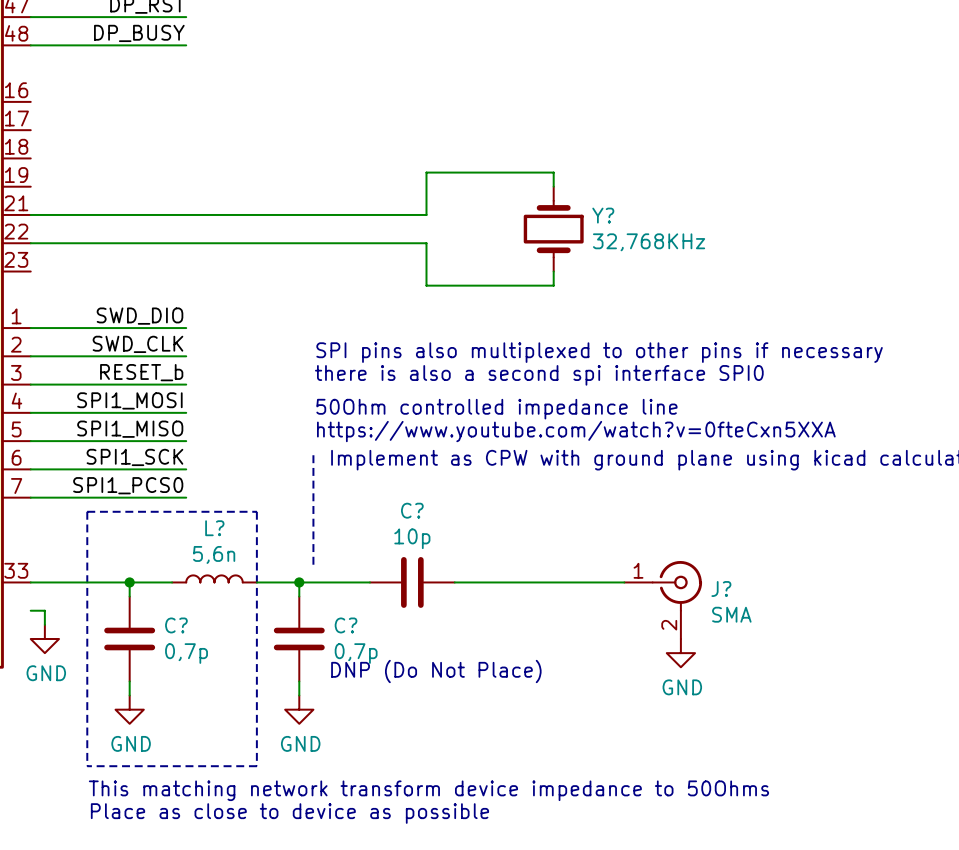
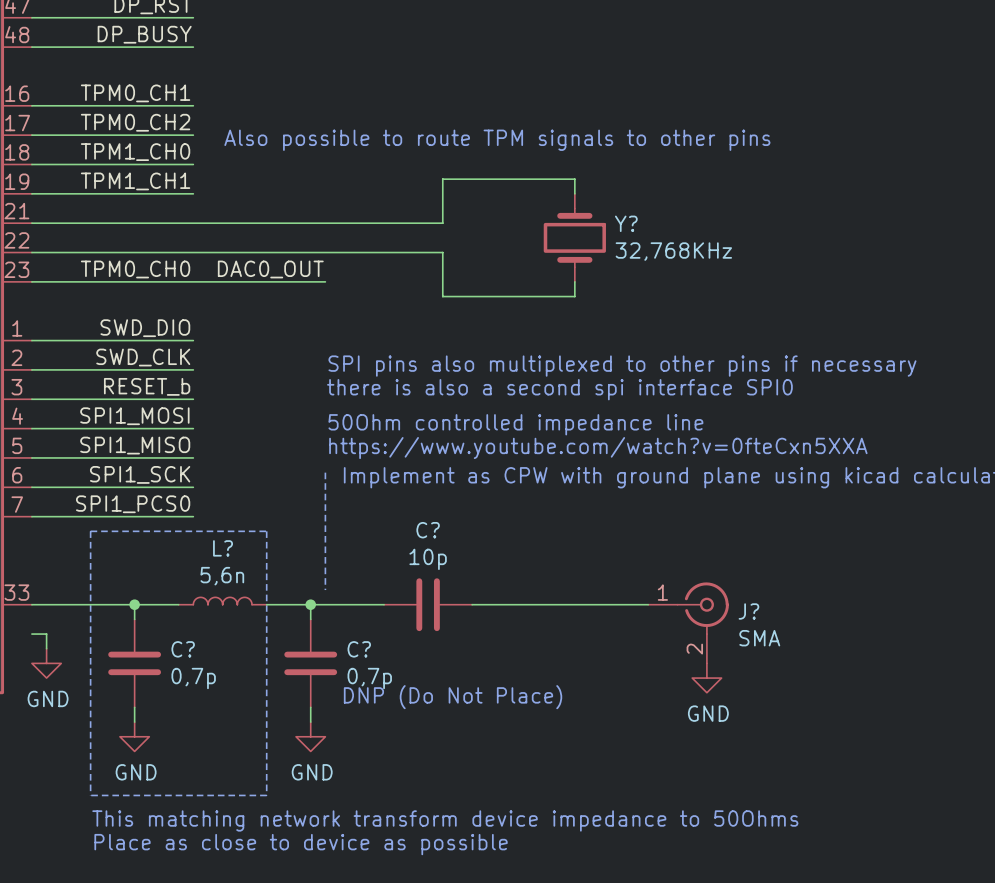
label: none -> TPM0_CH1 (135, 93)
wire: none -> (31, 105) (193, 105)
label: none -> TPM0_CH2 (135, 122)
wire: none -> (31, 135) (193, 135)
text: none -> Also possible to route TPM signals to other pins (497, 140)
label: none -> TPM1_CH0 (135, 152)
wire: none -> (31, 164) (193, 164)
label: none -> TPM1_CH1 (135, 181)
wire: none -> (31, 193) (193, 193)
label: none -> TPM0_CH0 (135, 269)
label: none -> DAC0_OUT (270, 269)
wire: none -> (31, 281) (325, 281)

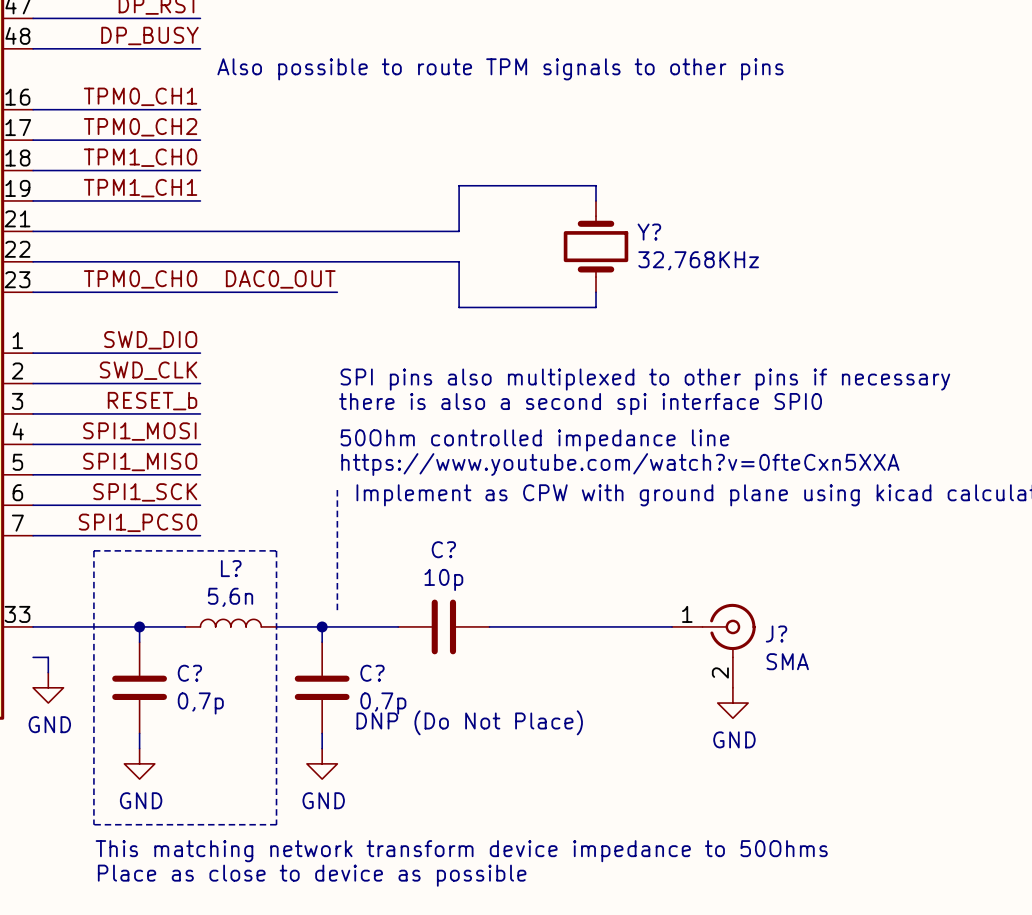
text position: Also possible to route TPM signals to other pins (497, 140) -> Also possible to route TPM signals to other pins (500, 69)

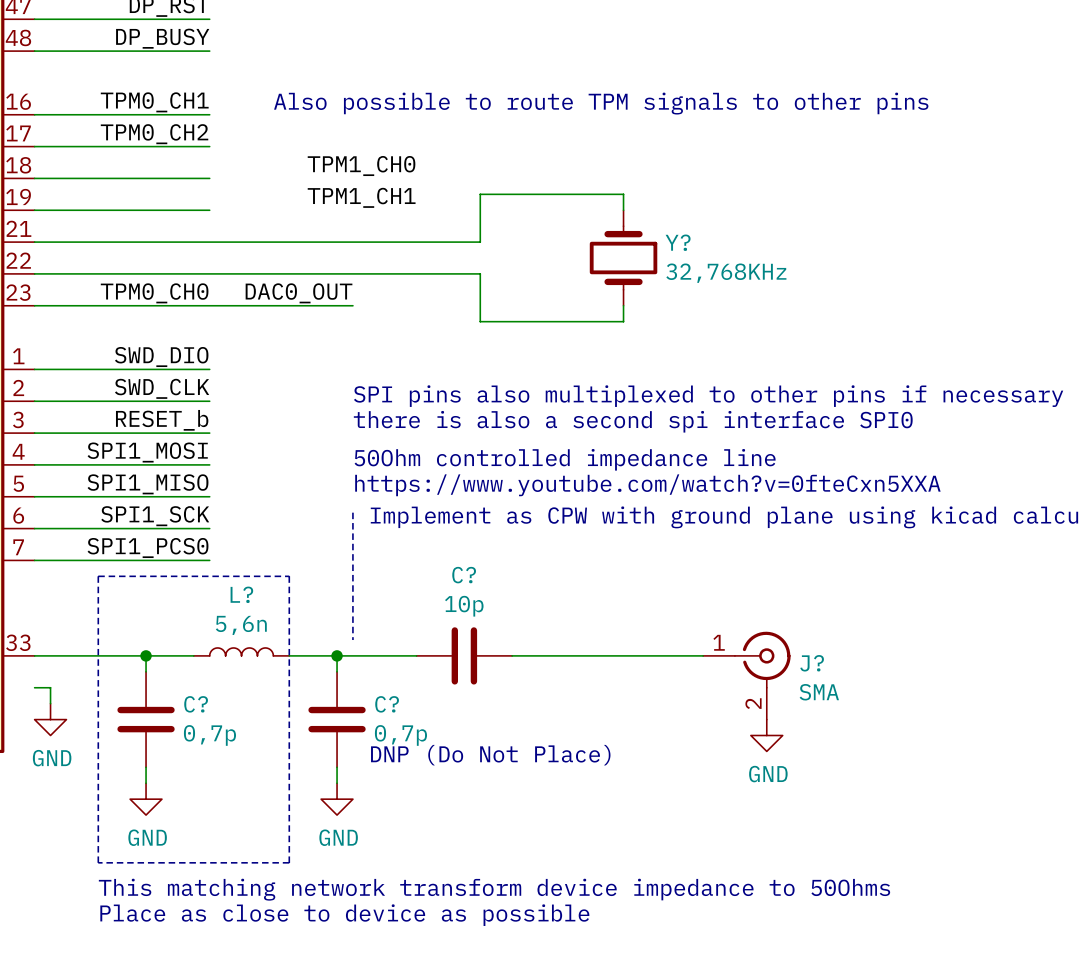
text position: Also possible to route TPM signals to other pins (500, 69) -> Also possible to route TPM signals to other pins (601, 103)
label position: TPM1_CH0 (140, 157) -> TPM1_CH0 (361, 166)
label position: TPM1_CH1 (140, 188) -> TPM1_CH1 (361, 197)

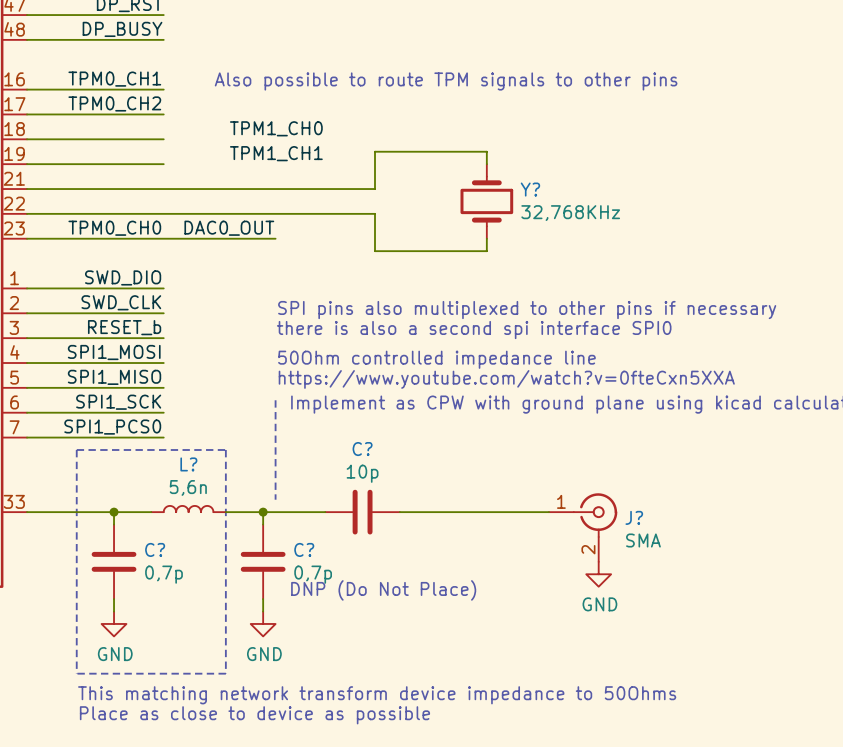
wire: (34, 687) (50, 687) (50, 703) -> none
power symbol: GND (50, 719) -> none

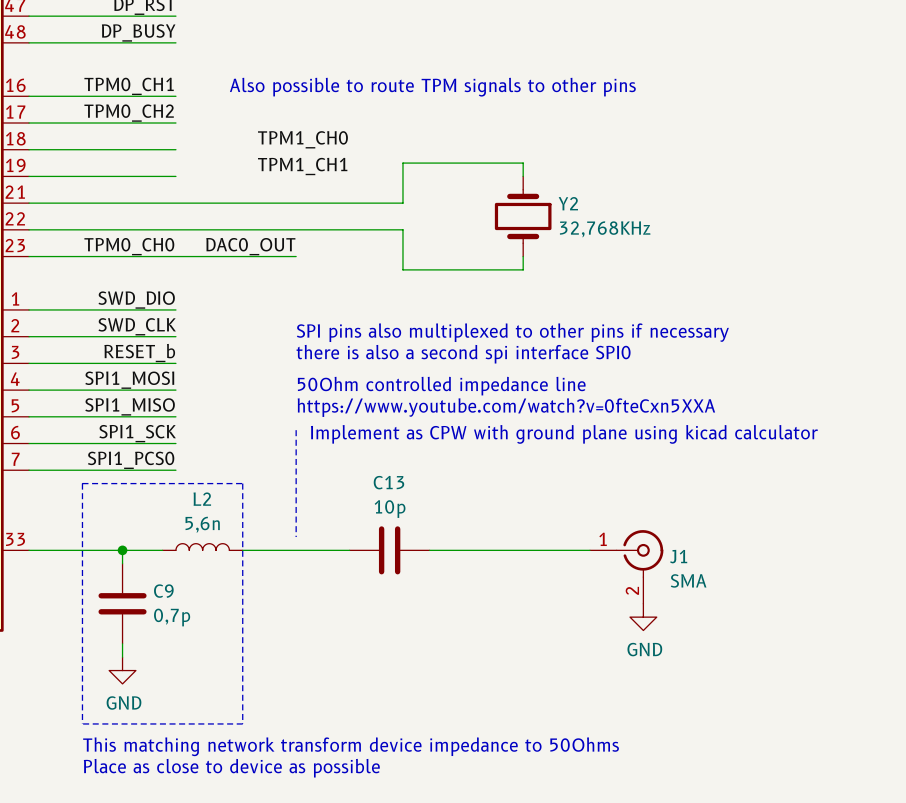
Y? name: Y? (530, 189) -> Y2 (568, 203)
C? name: C? (362, 449) -> C13 (388, 482)
L? name: L? (188, 464) -> L2 (202, 499)
wire: (263, 512) (263, 524) -> none
junction: (263, 512) -> none
J? name: J? (634, 517) -> J1 (678, 556)
C? name: C? (155, 549) -> C9 (163, 591)
C?: 0,7p (263, 561) -> none
text: DNP (Do Not Place) (383, 590) -> none
wire: (263, 599) (263, 611) -> none
power symbol: GND (263, 623) -> none

